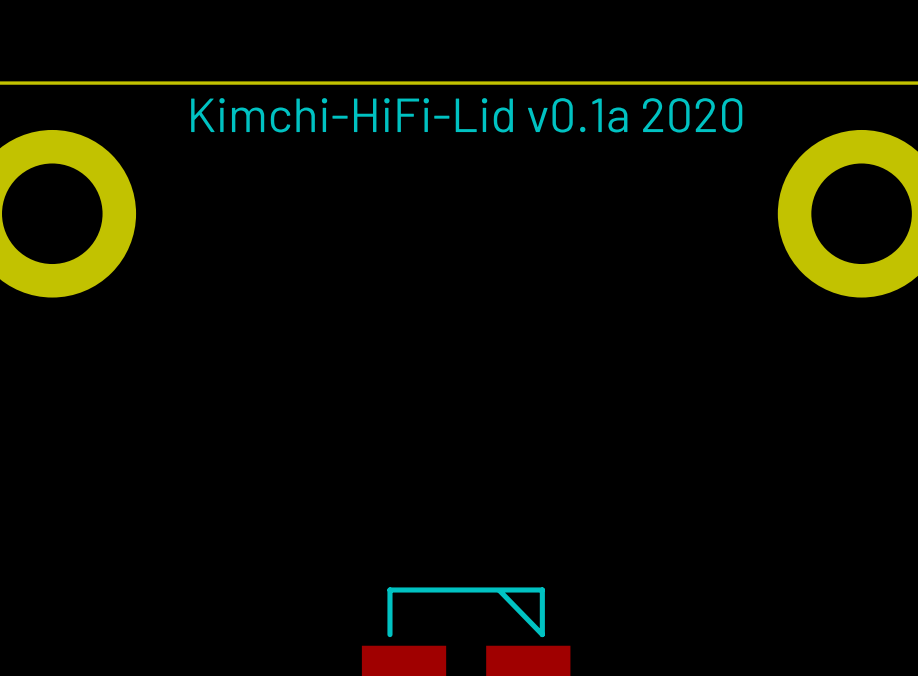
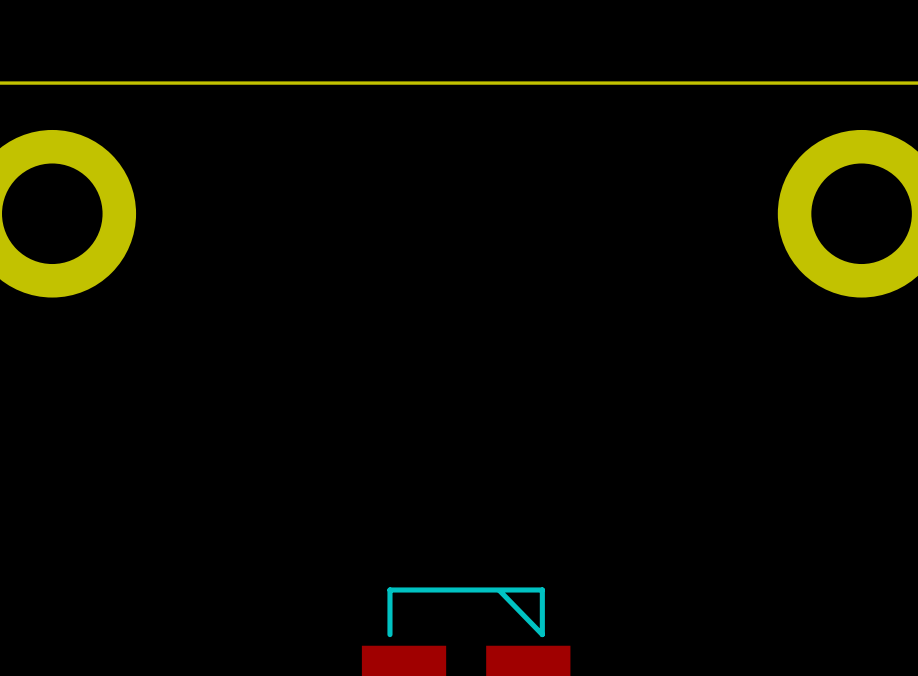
text: Kimchi-HiFi-Lid v0.1a 2020 (466, 115) -> none

